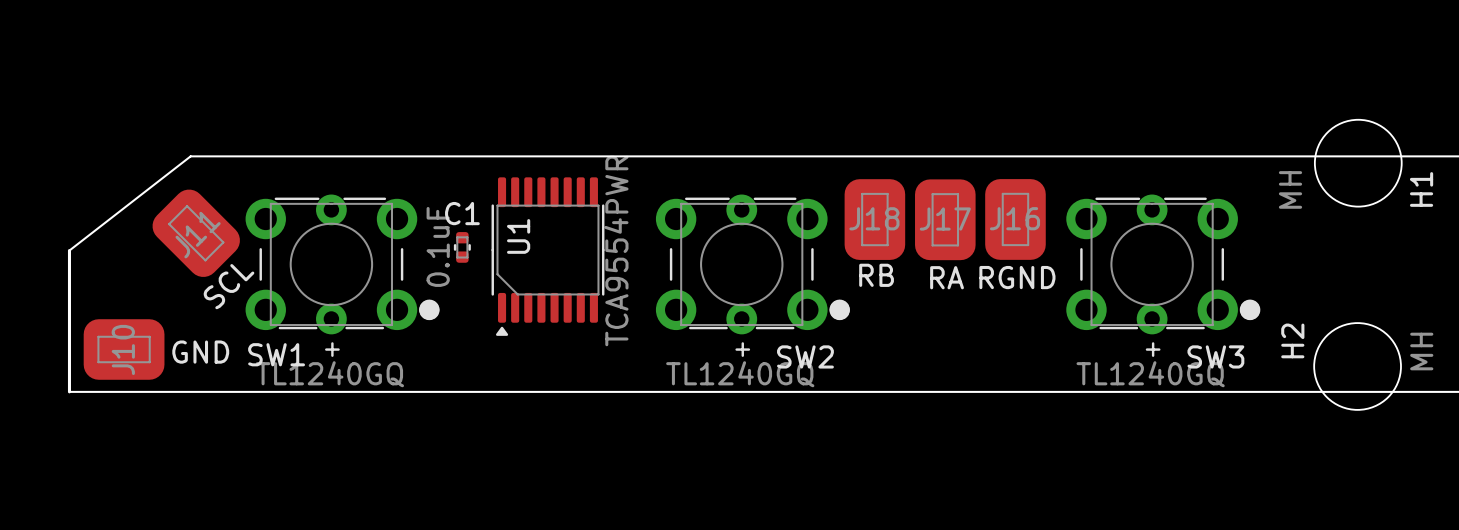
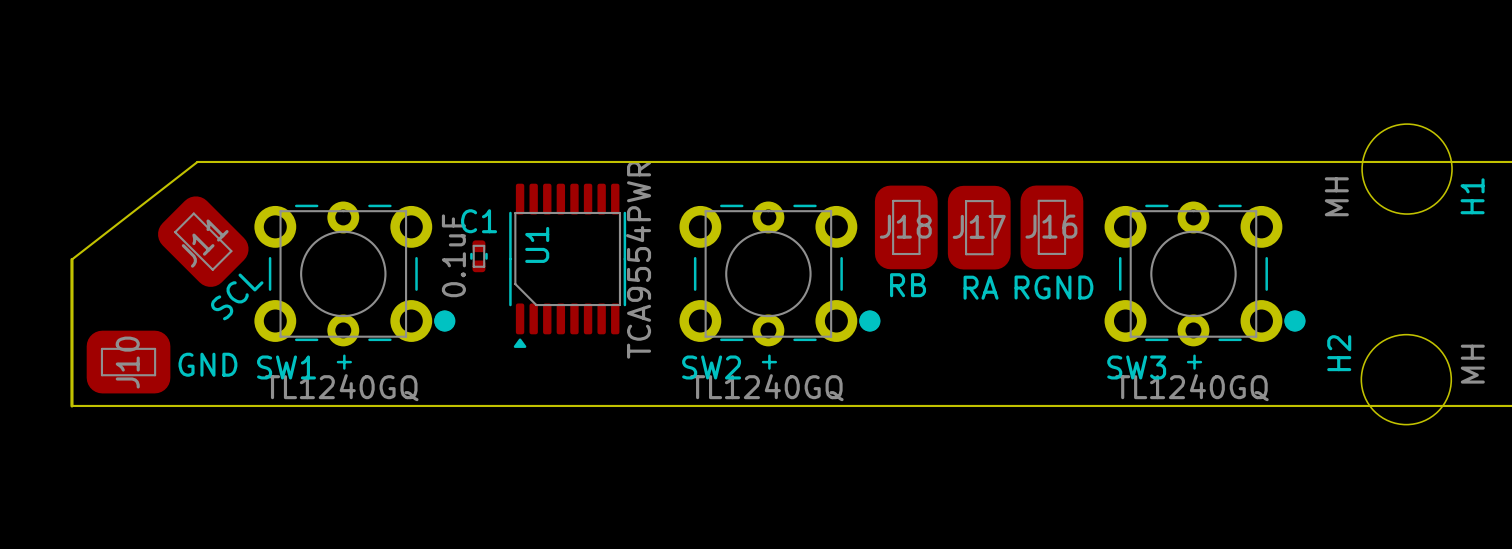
SW1 footprint: [245, 194, 440, 335] -> [254, 201, 456, 347]
SW2 footprint: [655, 194, 850, 335] -> [679, 201, 881, 347]
SW3 footprint: [1066, 194, 1261, 335] -> [1104, 201, 1306, 347]
SW2 name position: SW2 (805, 356) -> SW2 (711, 367)
SW3 name position: SW3 (1215, 356) -> SW3 (1136, 367)

